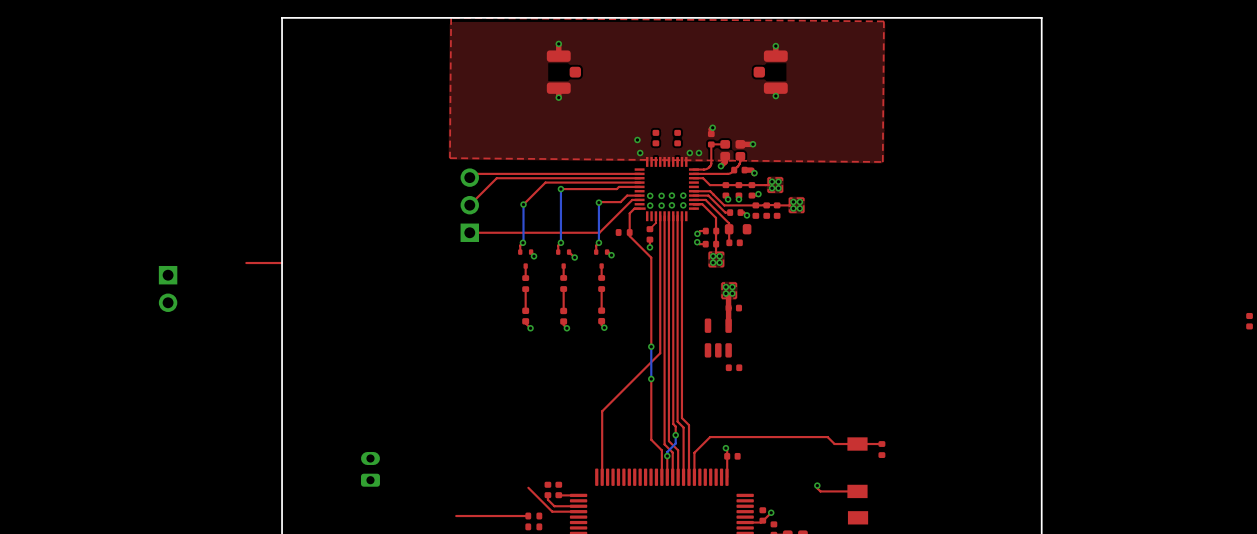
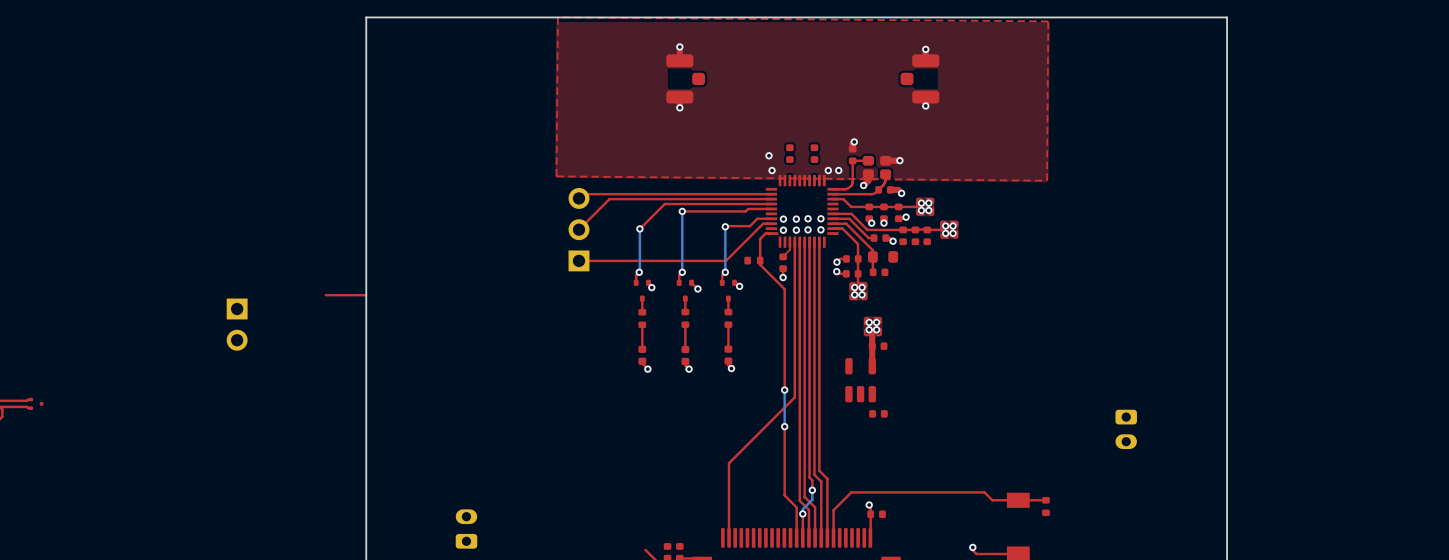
part: none -> (1126, 429)

